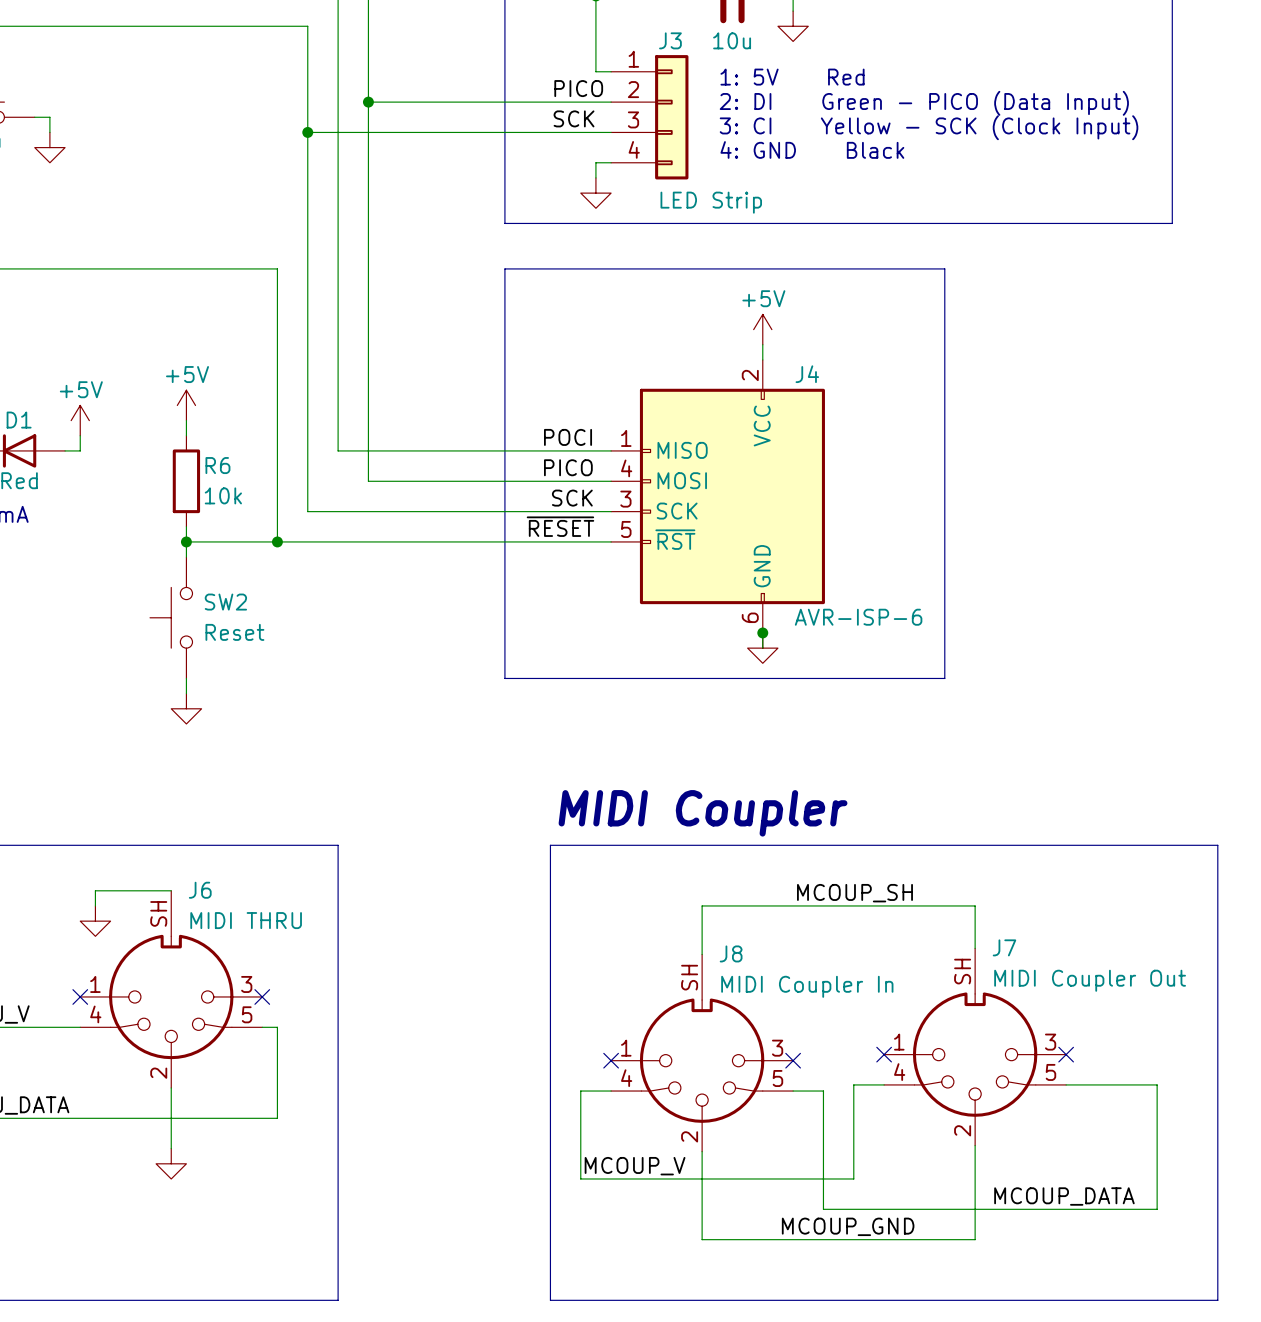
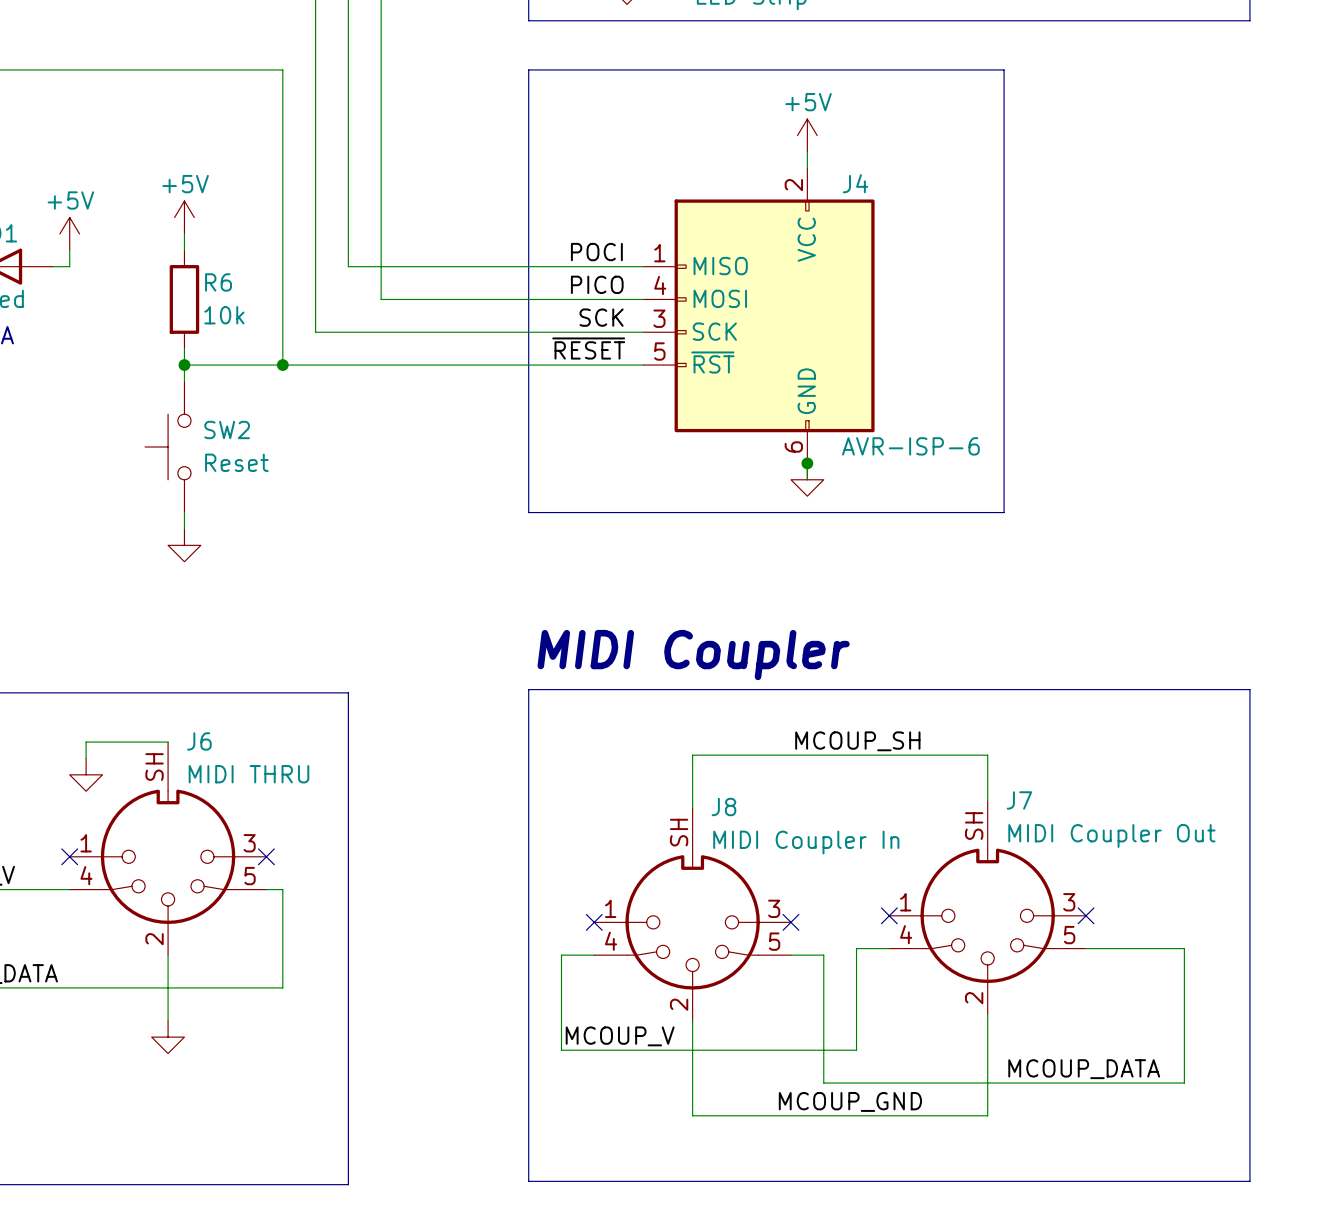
text position: MIDI Coupler (703, 813) -> MIDI Coupler (693, 655)
line: (550, 845) (1217, 845) (1217, 1300) (550, 1300) (550, 845) -> (528, 689) (1249, 689) (1249, 1181) (528, 1181) (528, 689)
label position: MCOUP_SH (854, 893) -> MCOUP_SH (857, 741)
wire: (975, 948) (975, 905) (702, 905) (702, 954) -> (987, 801) (987, 755) (692, 755) (692, 807)
J7 position: (975, 1047) -> (987, 907)
no-connect mark: none -> (889, 915)
J8 position: (702, 1053) -> (692, 914)
no-connect mark: (884, 1054) -> none
no-connect mark position: (1066, 1054) -> (1086, 915)
no-connect mark: none -> (790, 922)
no-connect mark position: (611, 1060) -> (594, 922)
no-connect mark: (793, 1060) -> none
wire: (884, 1084) (853, 1084) (853, 1178) (580, 1178) (580, 1091) (611, 1091) -> (889, 948) (856, 948) (856, 1050) (561, 1050) (561, 955) (594, 955)
wire: (1066, 1084) (1157, 1084) (1157, 1209) (823, 1209) (823, 1091) (793, 1091) -> (1086, 948) (1184, 948) (1184, 1083) (823, 1083) (823, 955) (790, 955)
wire: (975, 1145) (975, 1239) (702, 1239) (702, 1151) -> (987, 1014) (987, 1115) (692, 1115) (692, 1020)
label position: MCOUP_V (635, 1166) -> MCOUP_V (620, 1036)
label position: MCOUP_DATA (1064, 1196) -> MCOUP_DATA (1084, 1069)
label position: MCOUP_GND (848, 1226) -> MCOUP_GND (850, 1101)

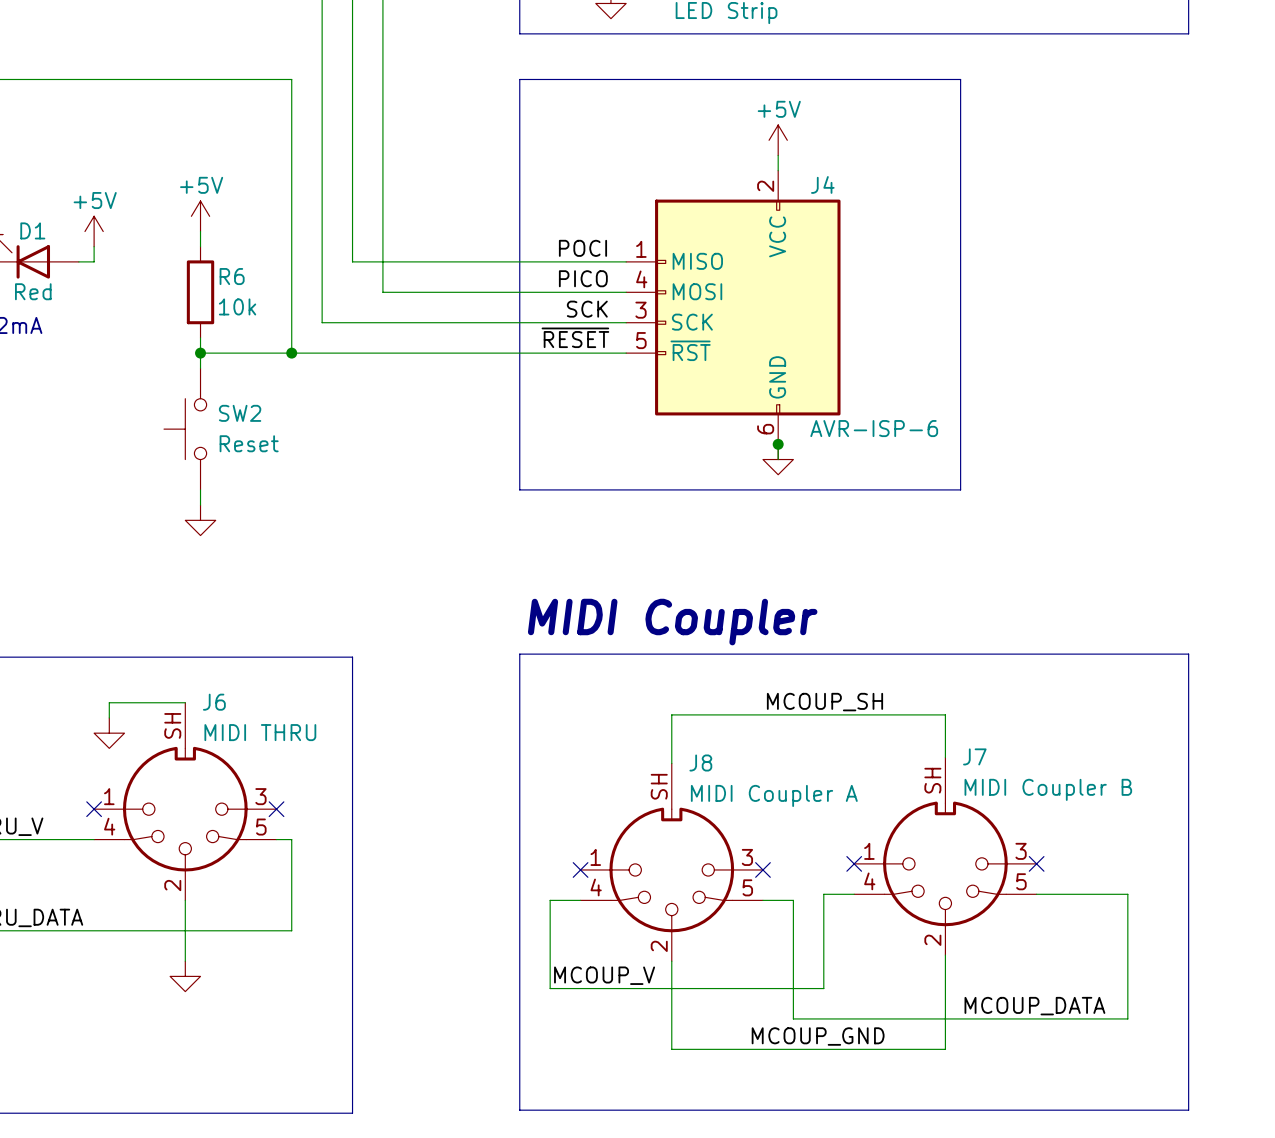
J7 value: MIDI Coupler Out (1111, 835) -> MIDI Coupler B (1048, 789)
J8 value: MIDI Coupler In (806, 842) -> MIDI Coupler A (774, 795)

